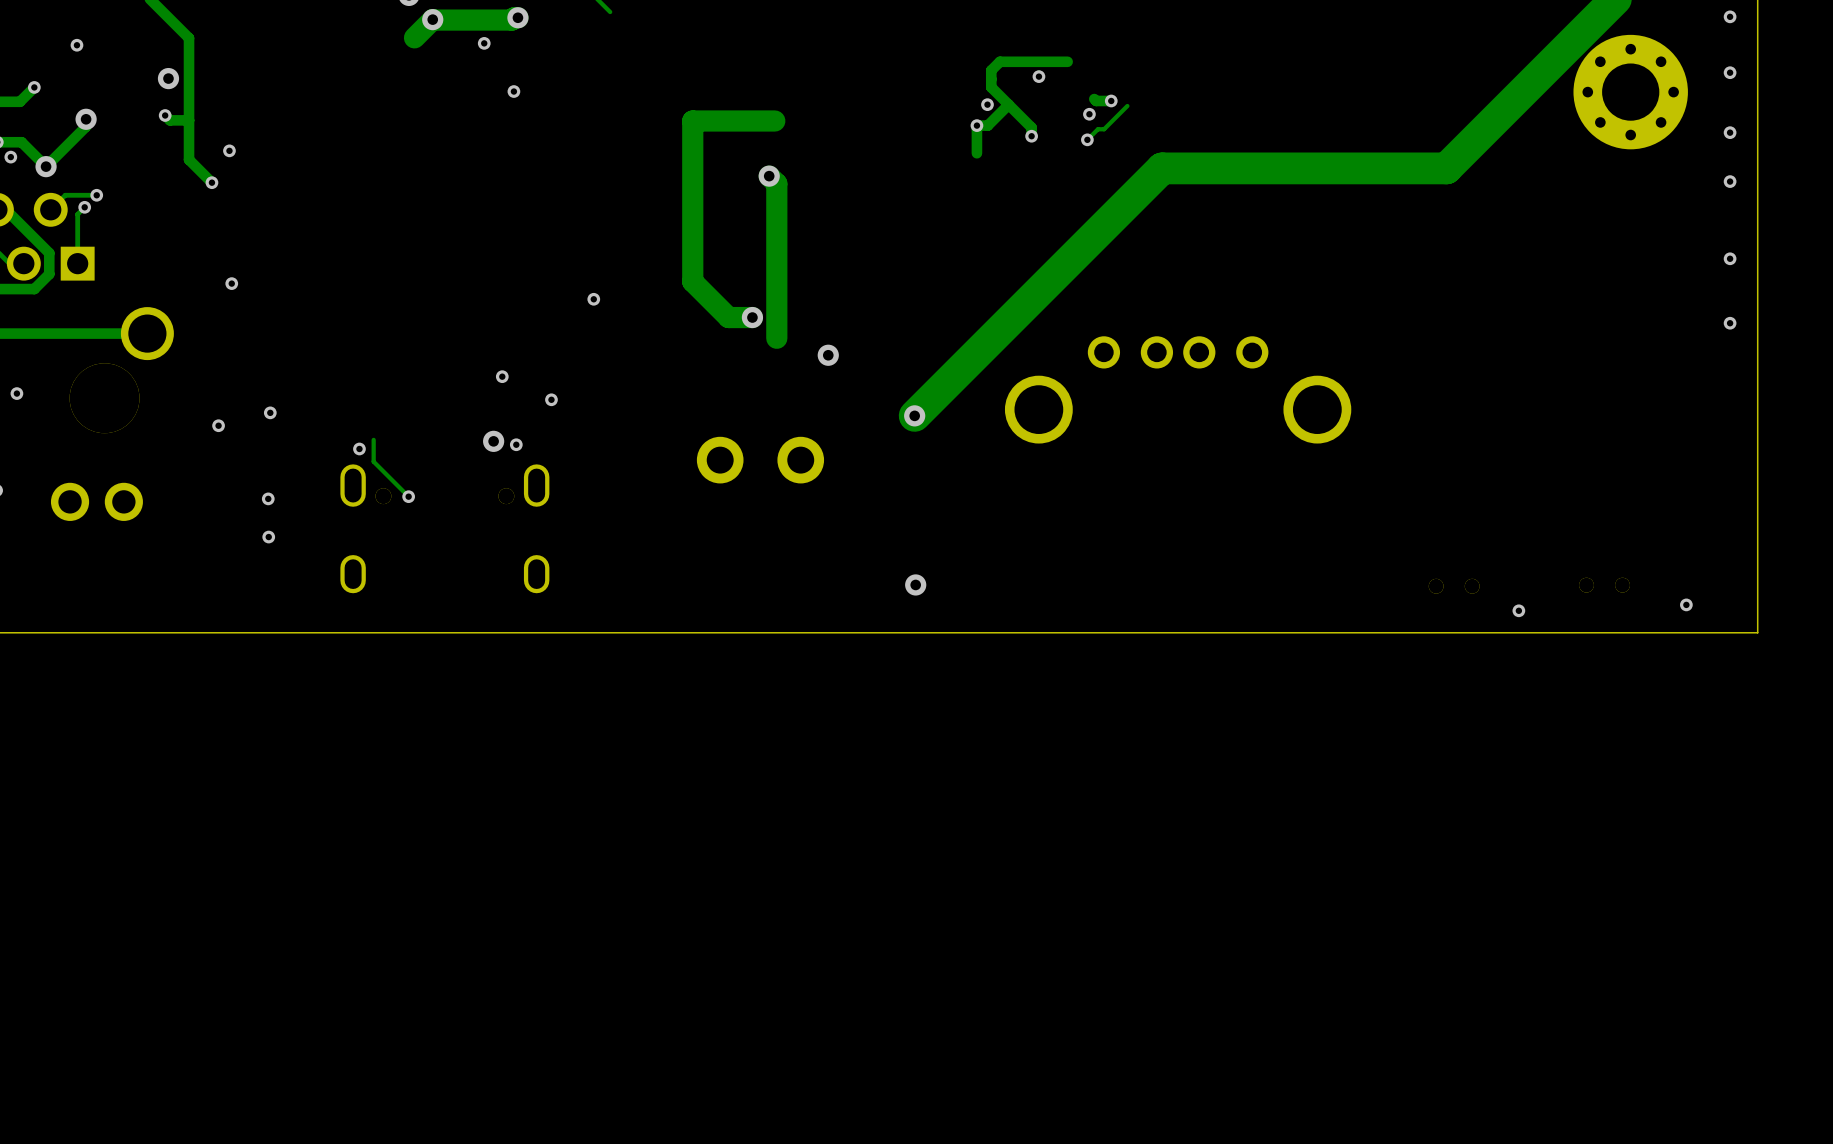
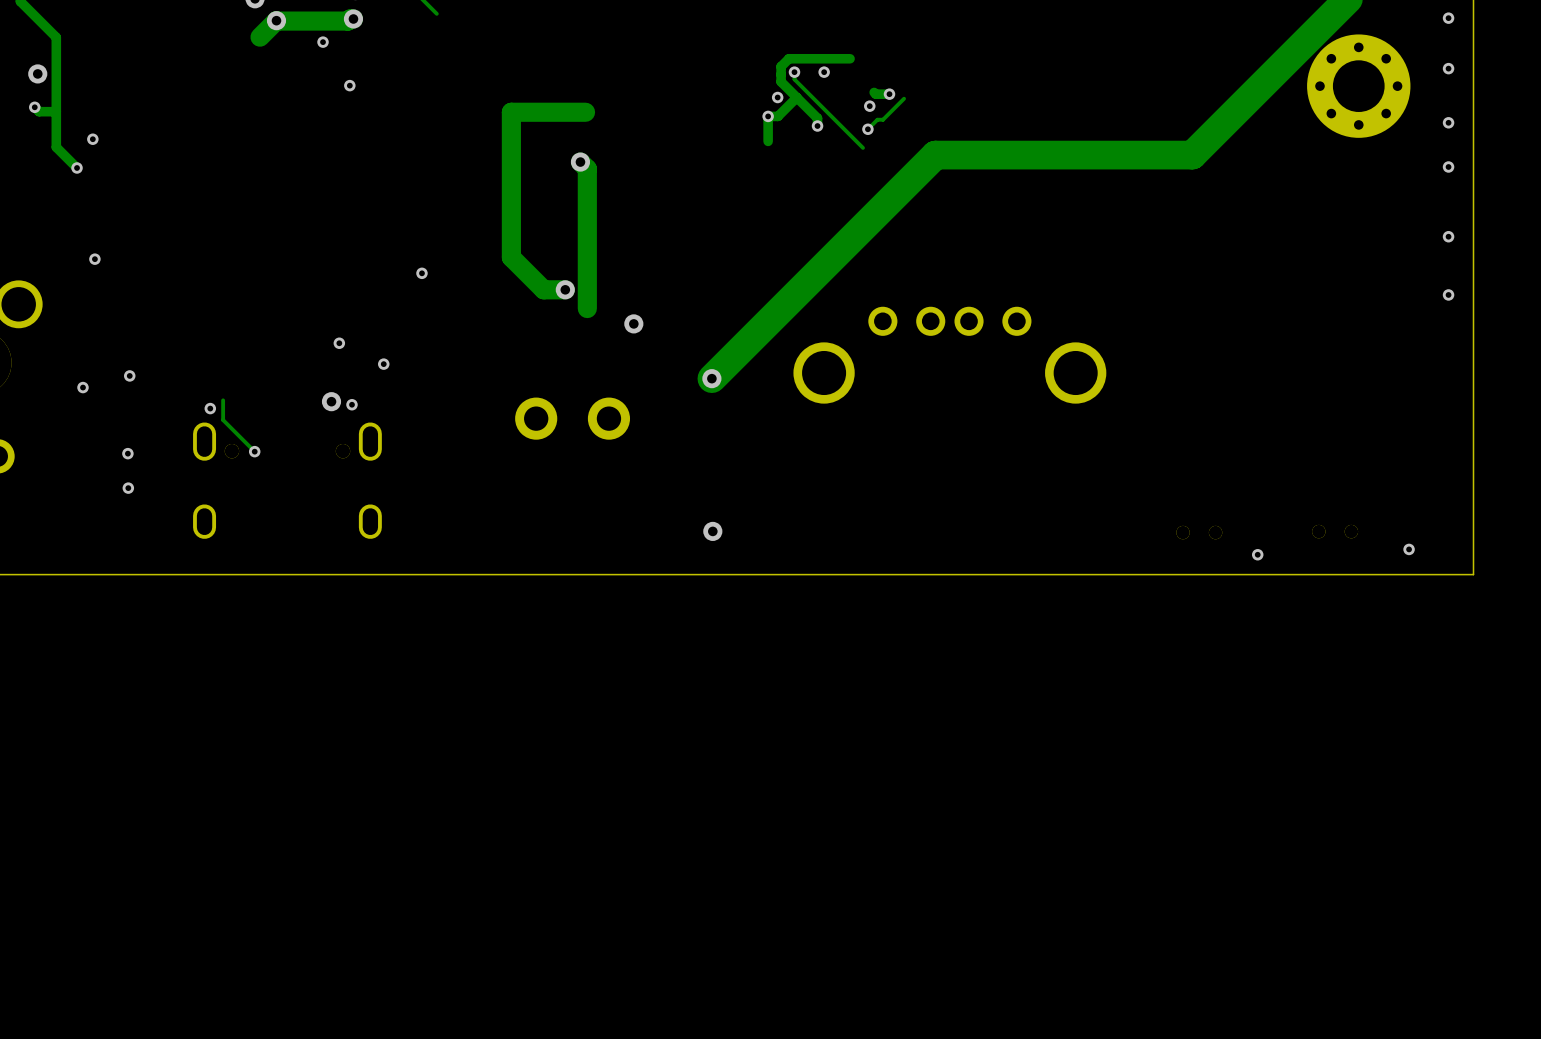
track: none -> (794, 72) (794, 79) (862, 147)
via: none -> (794, 72)

